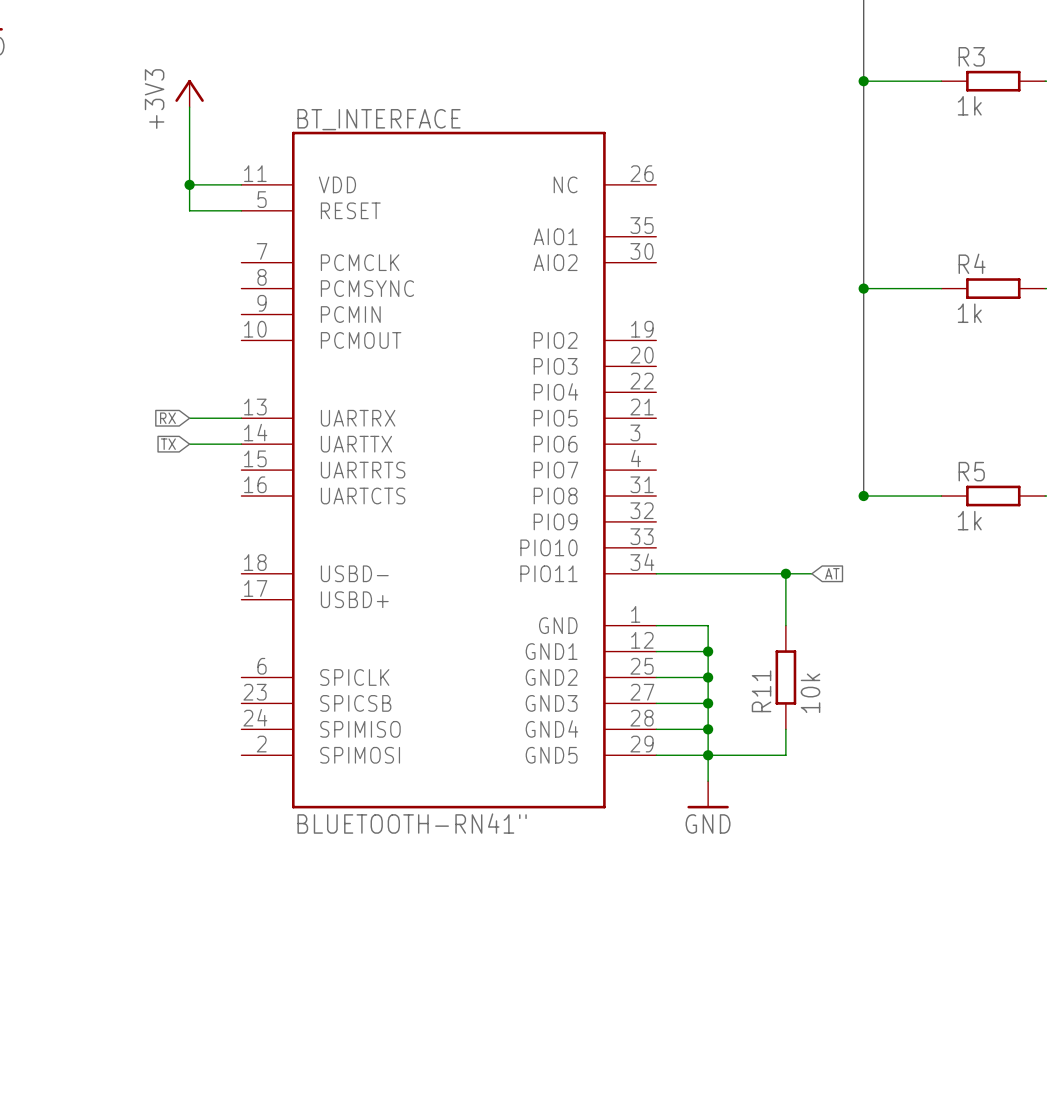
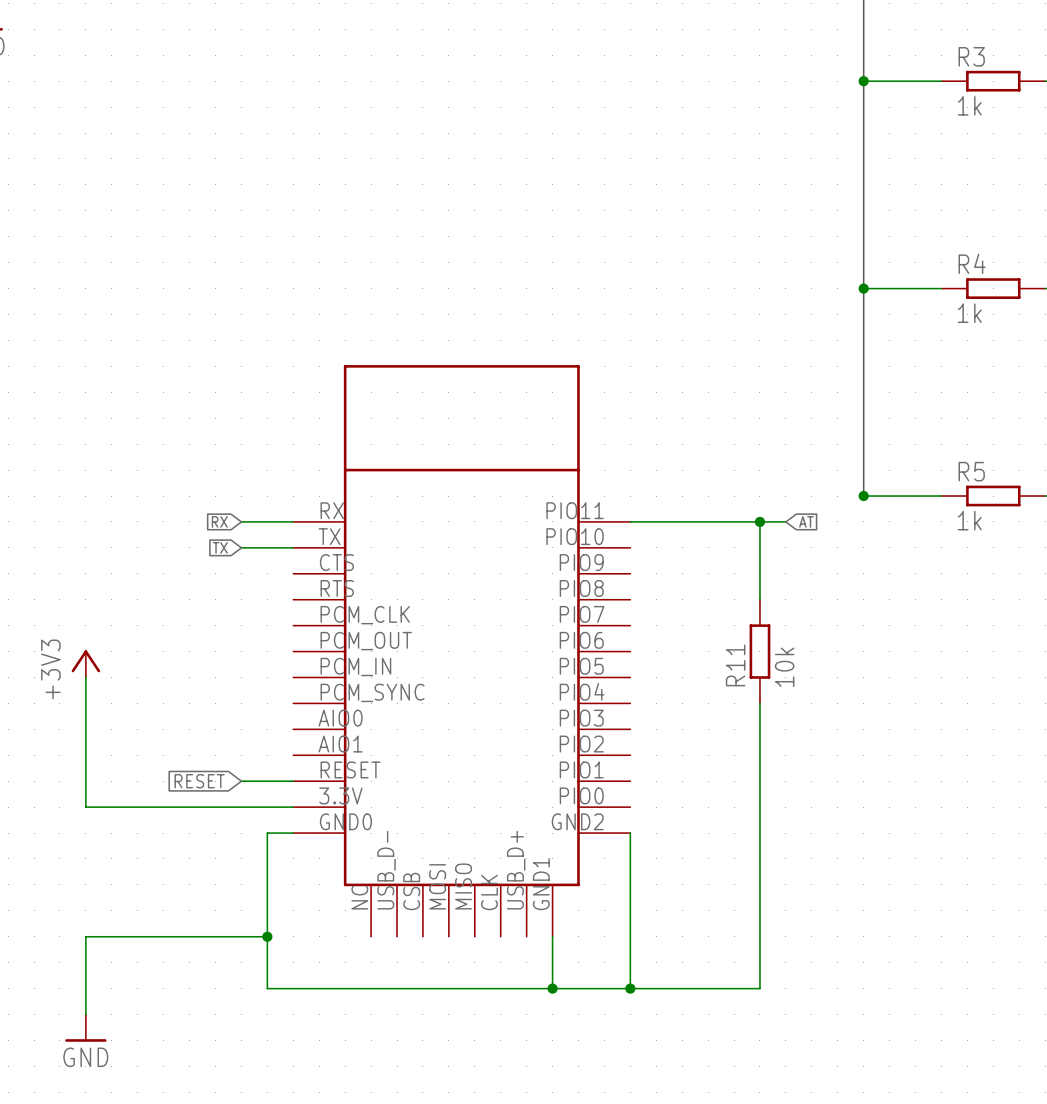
power symbol: +3V3 (189, 93) -> none
wire: (189, 107) (189, 210) (241, 210) -> none
wire: (189, 184) (241, 184) -> none
junction: (189, 184) -> none
global label position: RX (167, 418) -> RX (219, 521)
wire: (189, 418) (241, 418) -> (241, 521) (293, 521)
global label position: TX (168, 444) -> TX (220, 547)
wire: (189, 444) (241, 444) -> (241, 547) (293, 547)
BT_INTERFACE: BLUETOOTH-RN41" (448, 470) -> none
wire: none -> (759, 521) (759, 599)
wire: (656, 573) (811, 573) -> (630, 521) (785, 521)
wire: (785, 573) (785, 625) -> none
junction position: (785, 573) -> (759, 521)
global label position: AT (832, 573) -> AT (806, 521)
wire: (656, 625) (708, 625) (708, 781) -> none
part: none -> (461, 650)
wire: (656, 651) (708, 651) -> none
junction: (708, 651) -> none
power symbol: none -> +3V3 (85, 663)
wire: none -> (85, 677) (85, 807) (293, 807)
wire: (656, 677) (708, 677) -> none
junction: (708, 677) -> none
R11 position: (785, 677) -> (759, 651)
wire: (656, 703) (708, 703) -> none
junction: (708, 703) -> none
wire: none -> (759, 703) (759, 988) (267, 988) (267, 833) (293, 833)
wire: (656, 729) (708, 729) -> none
junction: (708, 729) -> none
wire: (785, 729) (785, 755) (656, 755) -> none
junction: (708, 755) -> none
global label: none -> RESET (199, 781)
wire: none -> (241, 781) (293, 781)
power symbol: GND (708, 794) -> none
wire: none -> (630, 833) (630, 988)
wire: none -> (267, 936) (85, 936) (85, 1014)
junction: none -> (267, 936)
wire: none -> (552, 936) (552, 988)
junction: none -> (552, 988)
junction: none -> (630, 988)
power symbol: none -> GND (85, 1028)

